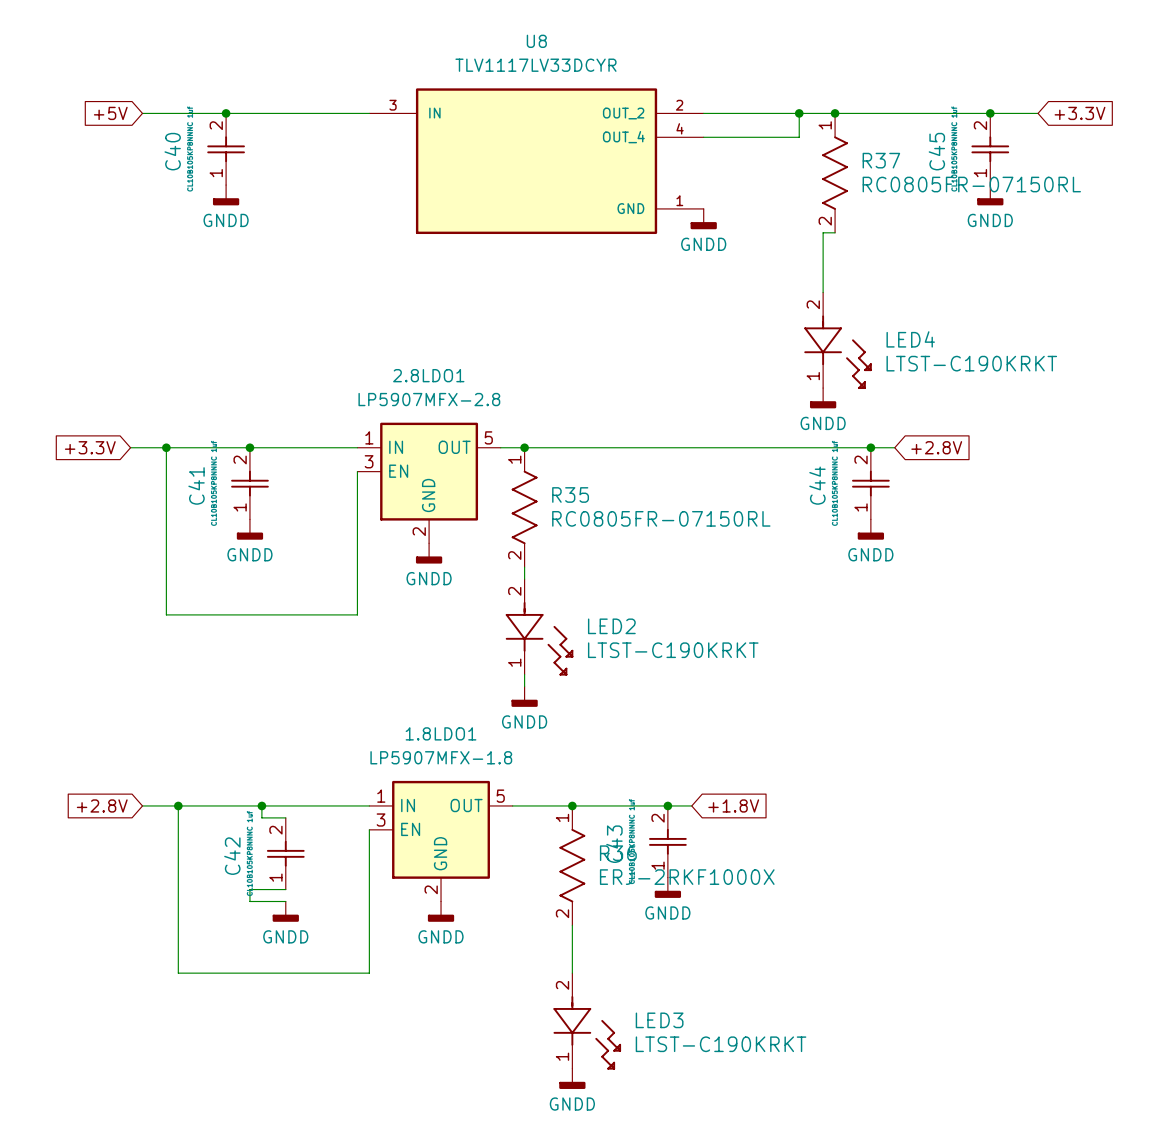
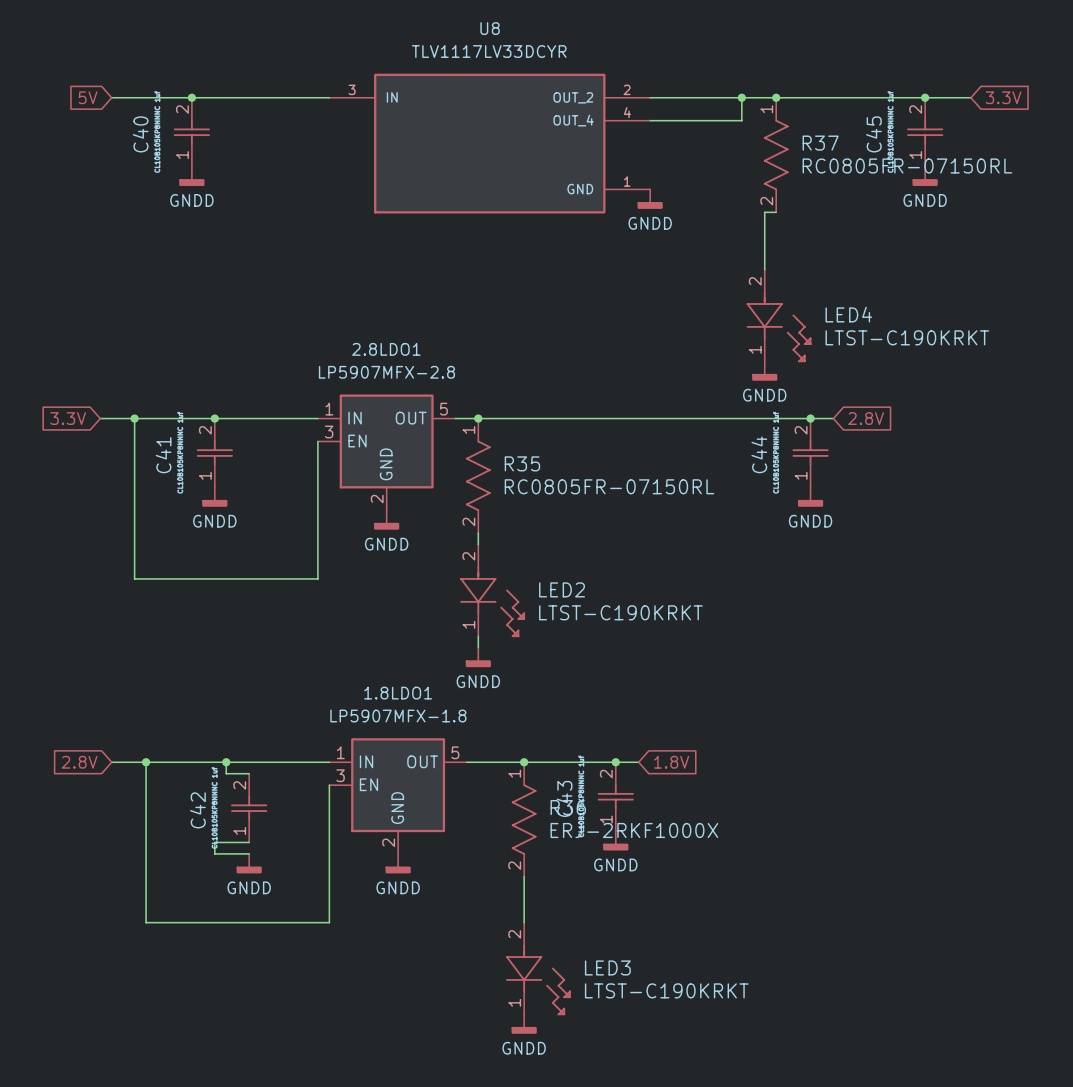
global label: +5V (110, 113) -> 5V (88, 97)
global label: +3.3V (1080, 113) -> 3.3V (1003, 97)
global label: +3.3V (90, 447) -> 3.3V (68, 418)
global label: +2.8V (936, 447) -> 2.8V (866, 418)
global label: +2.8V (102, 805) -> 2.8V (79, 762)
global label: +1.8V (733, 805) -> 1.8V (671, 762)

